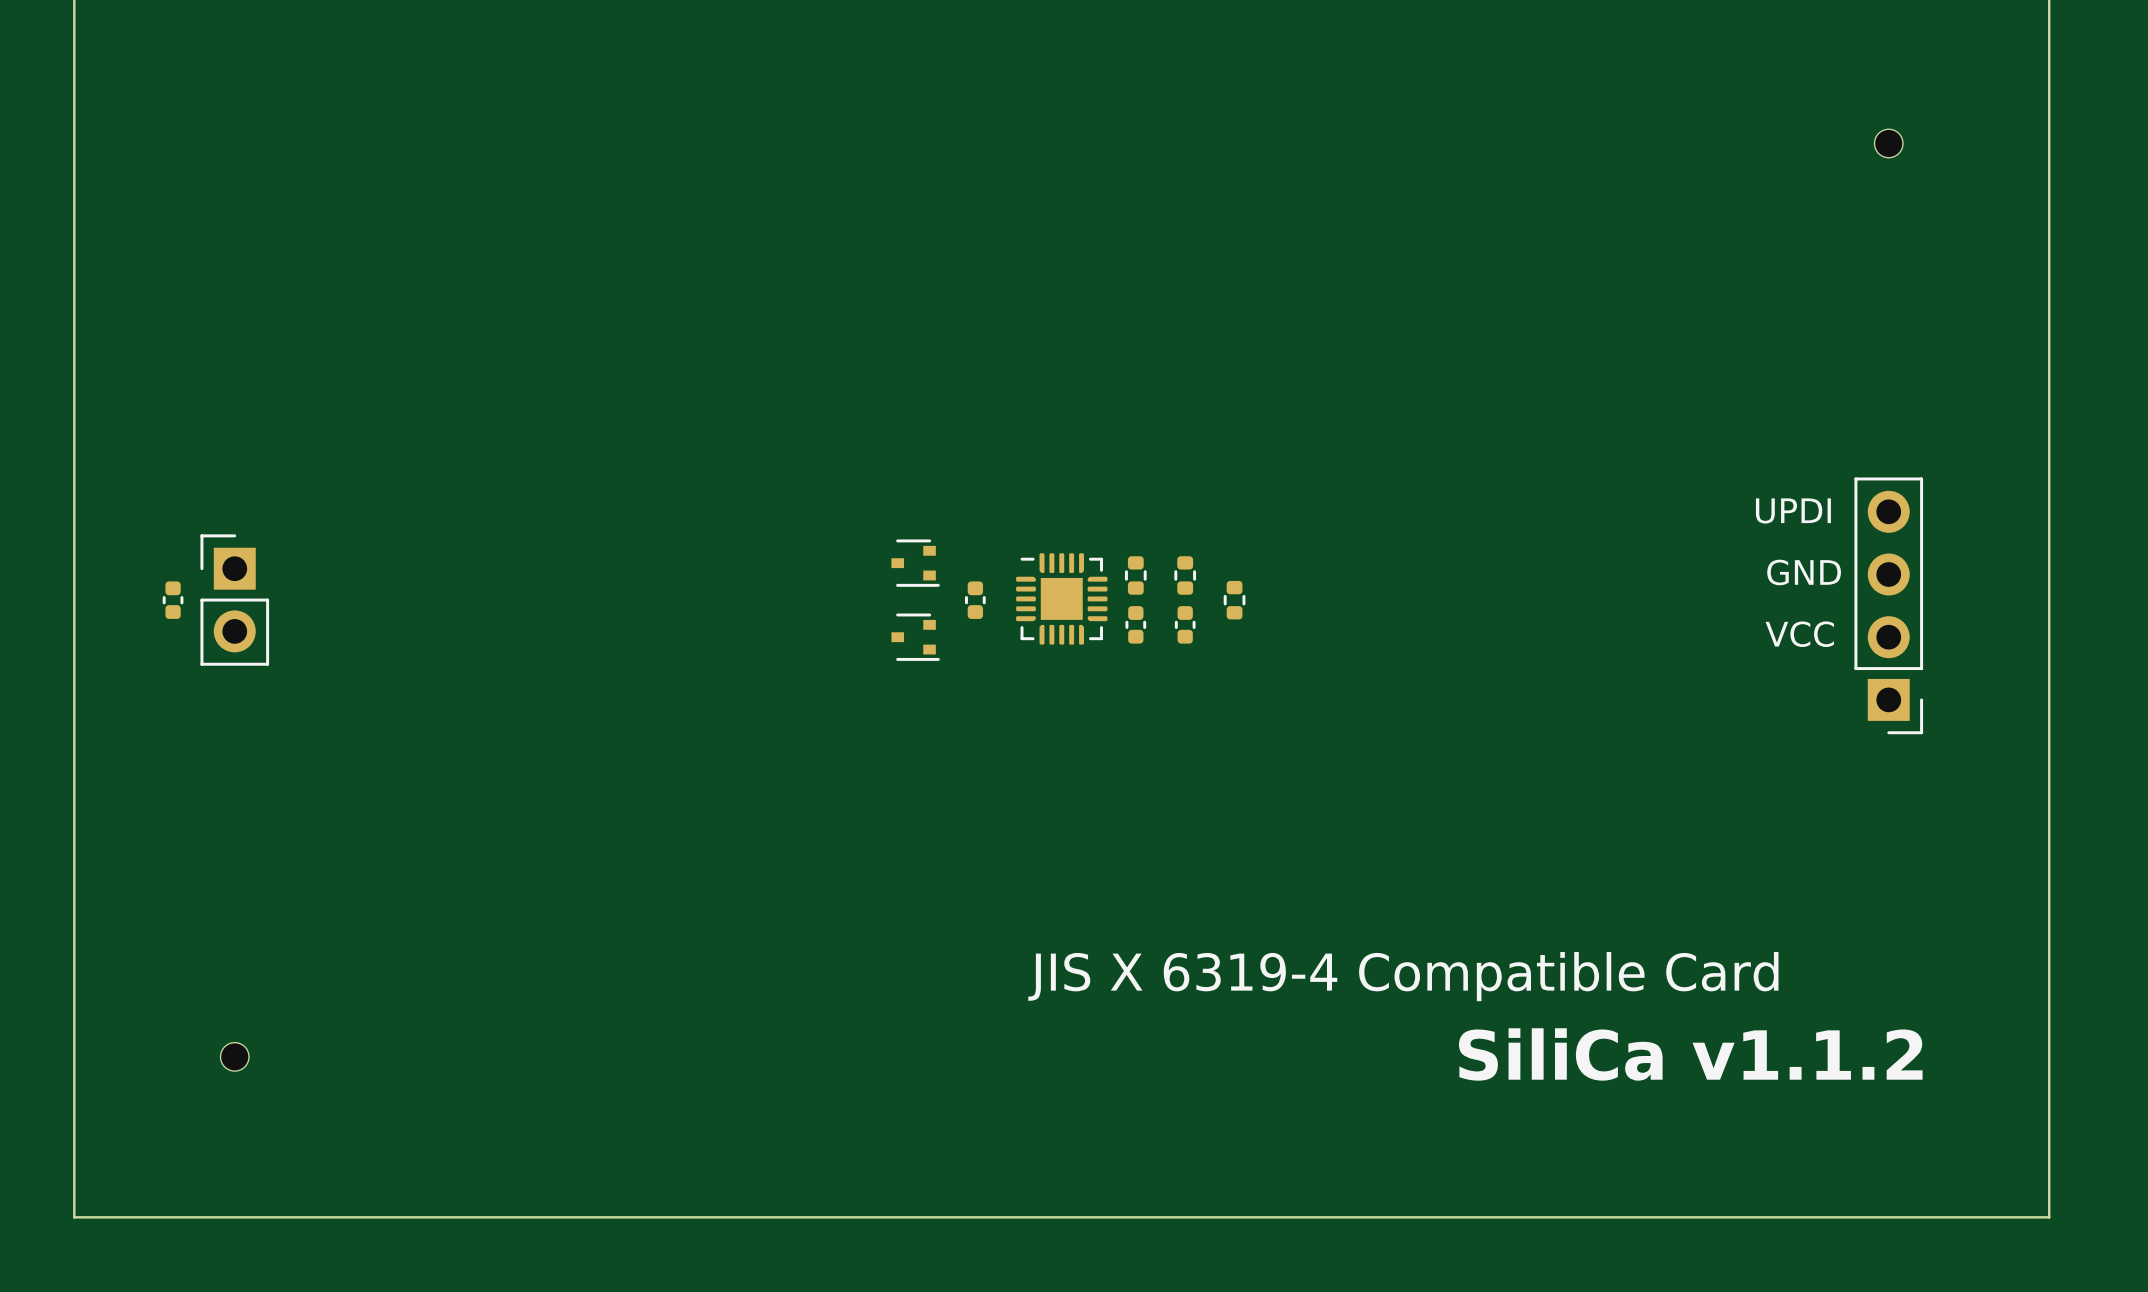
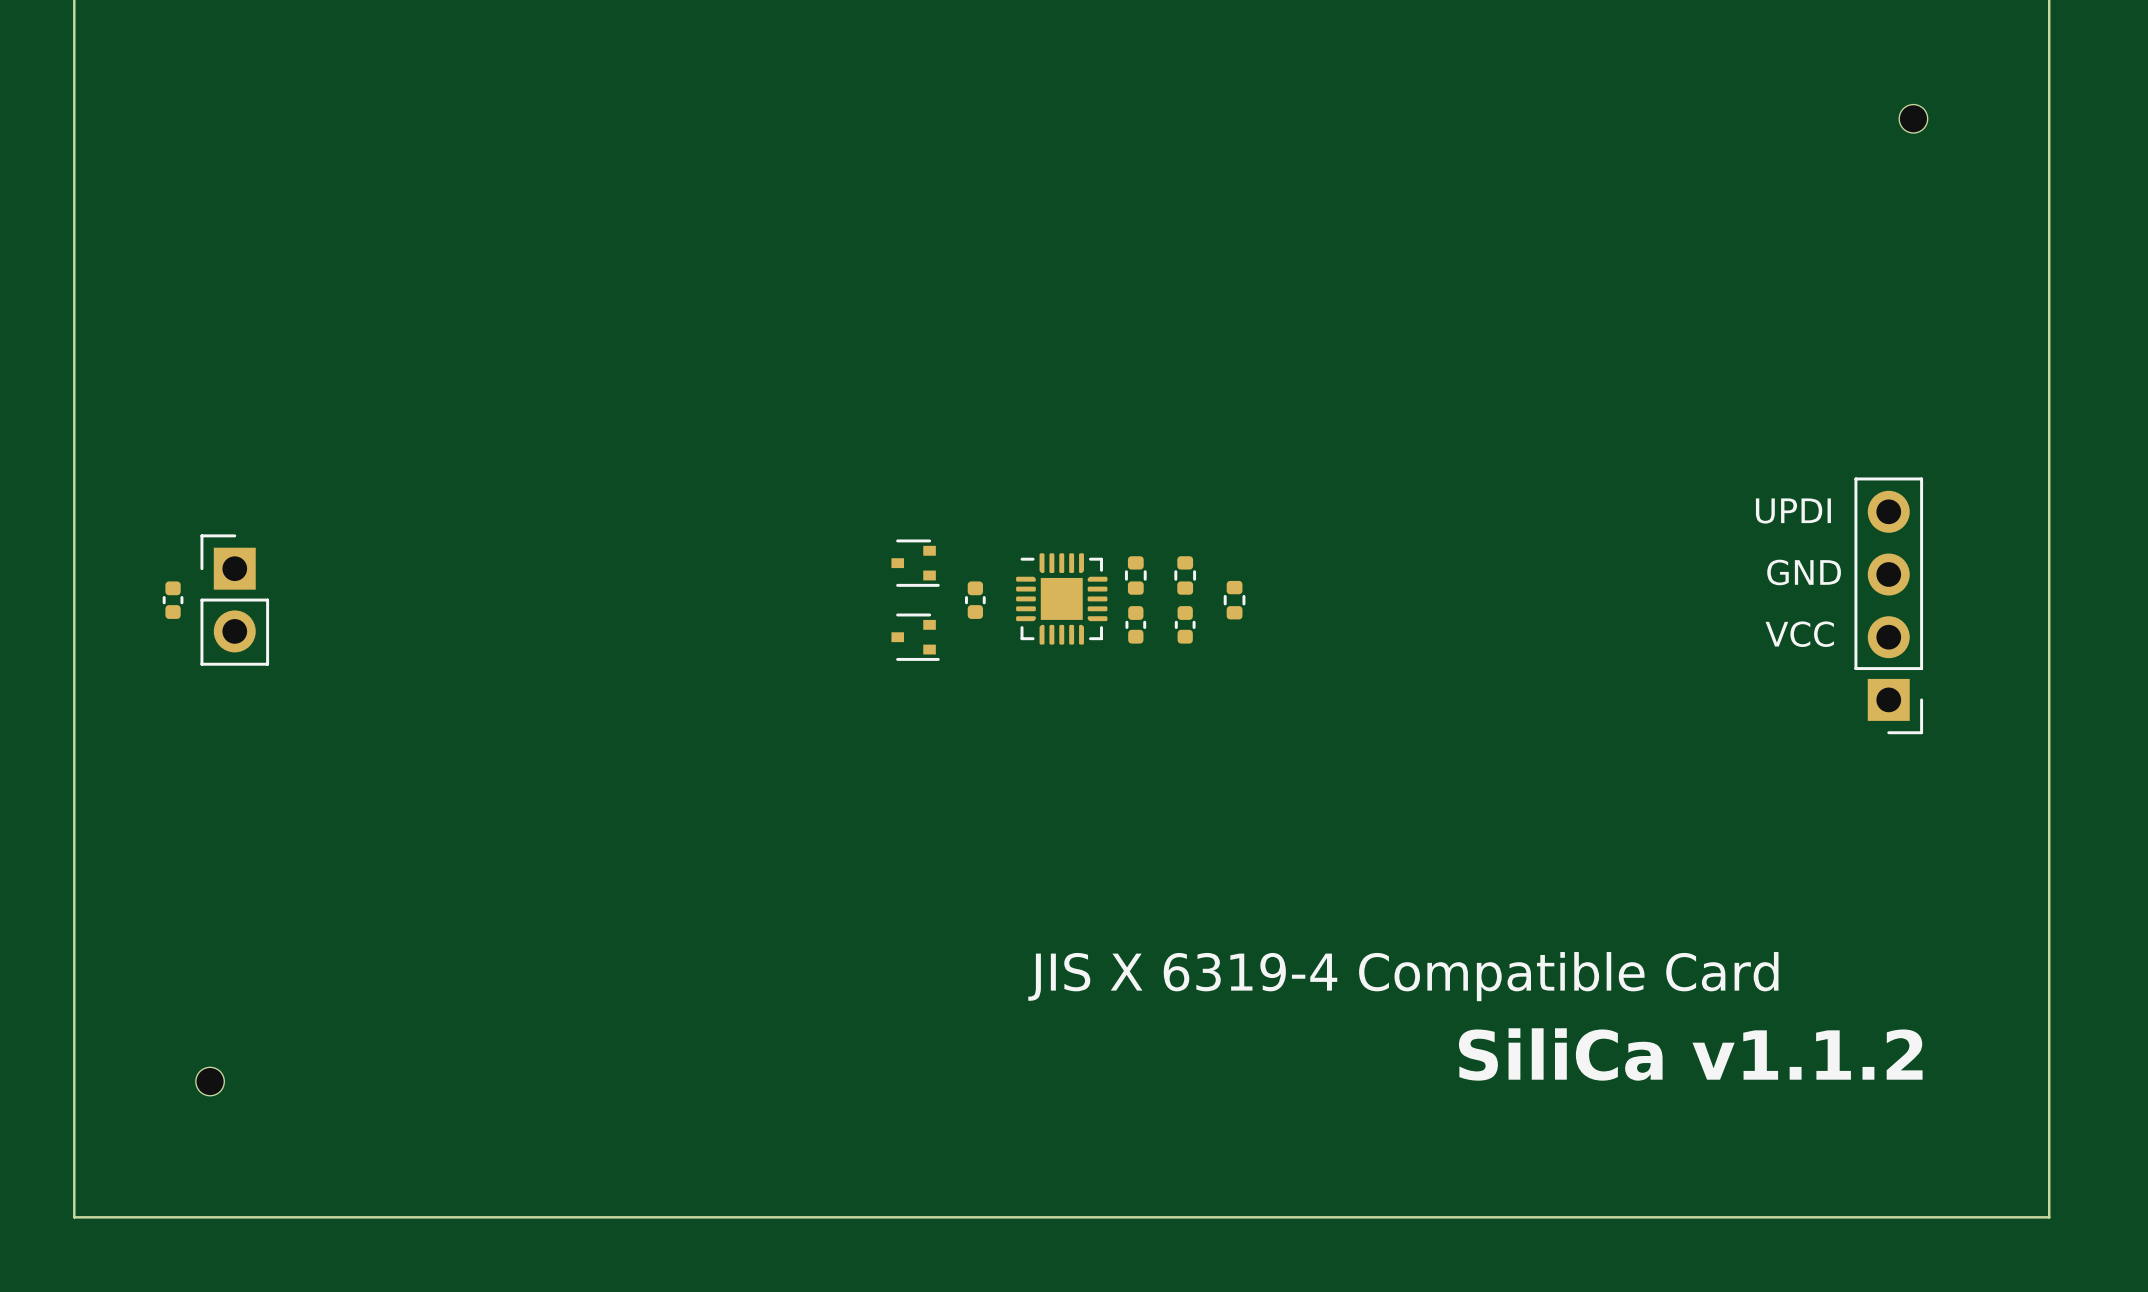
part position: (1888, 143) -> (1913, 118)
part position: (234, 1056) -> (210, 1081)

